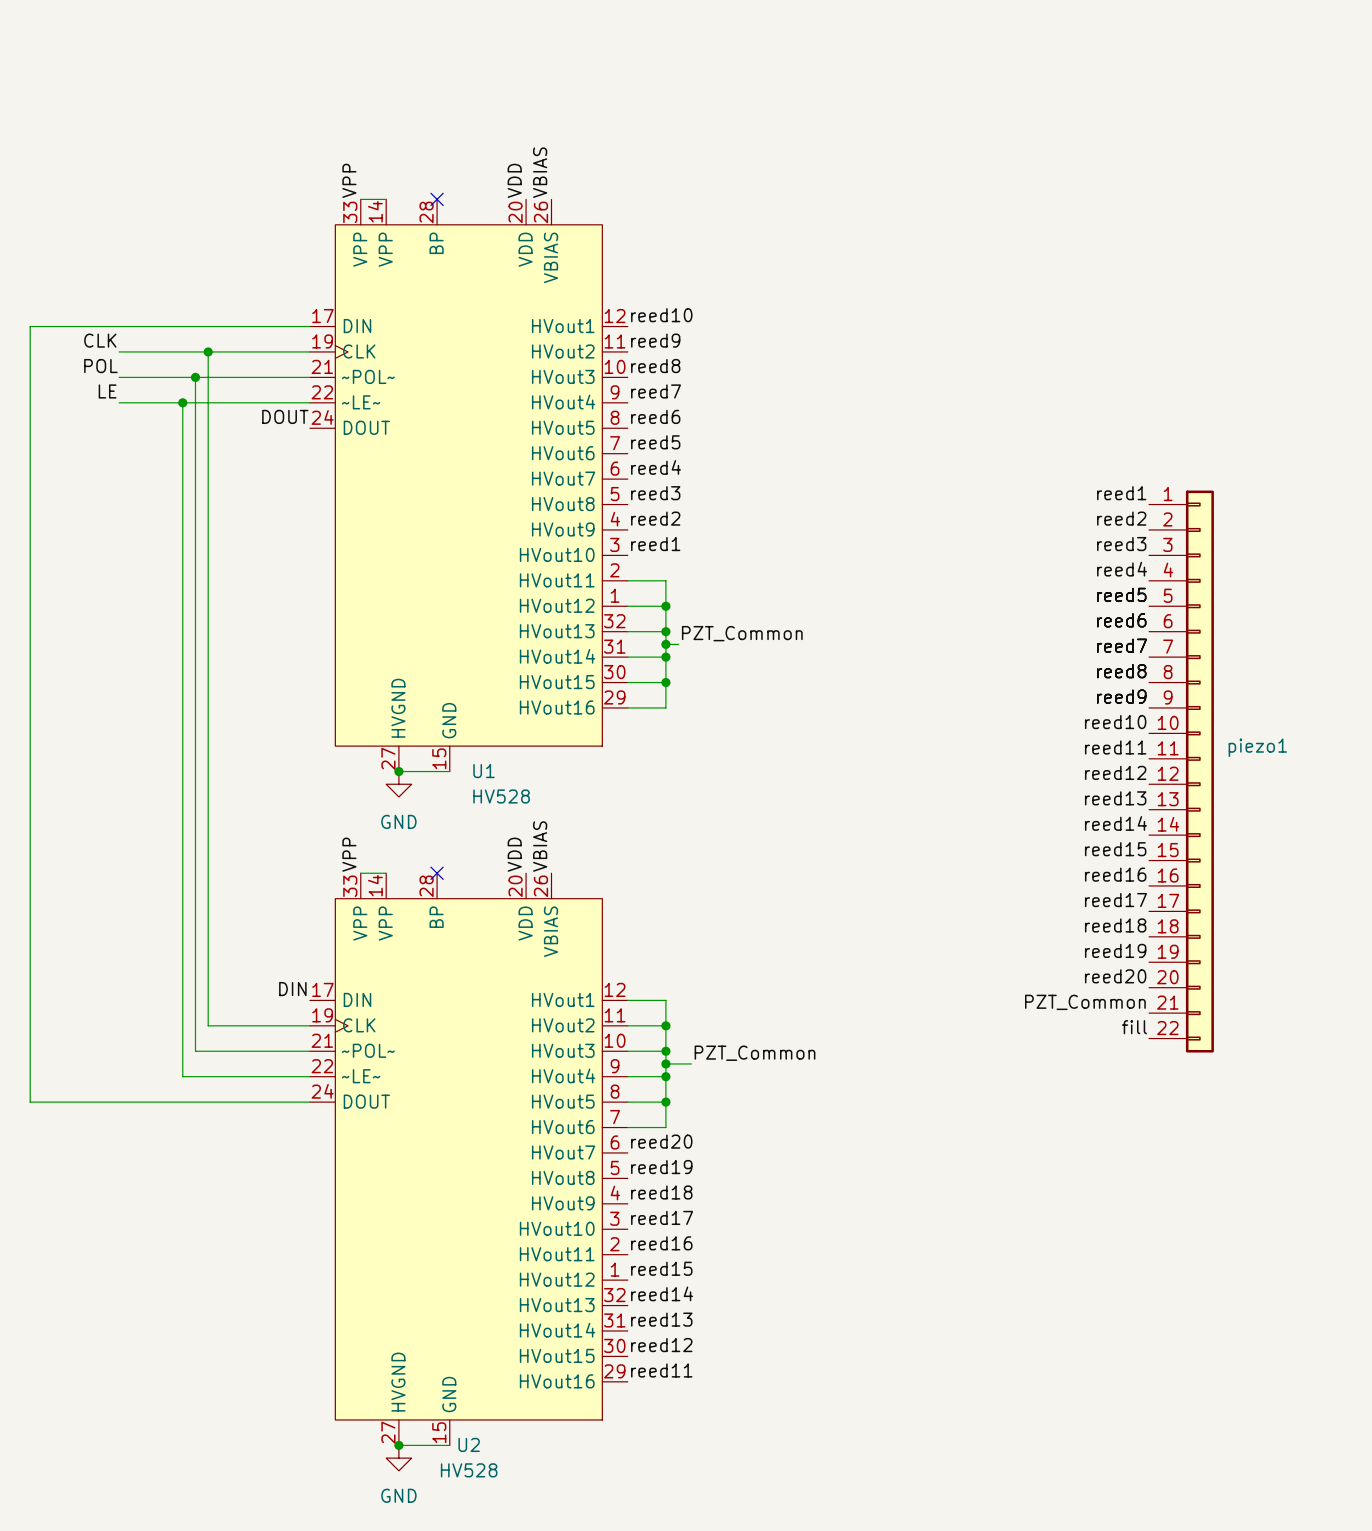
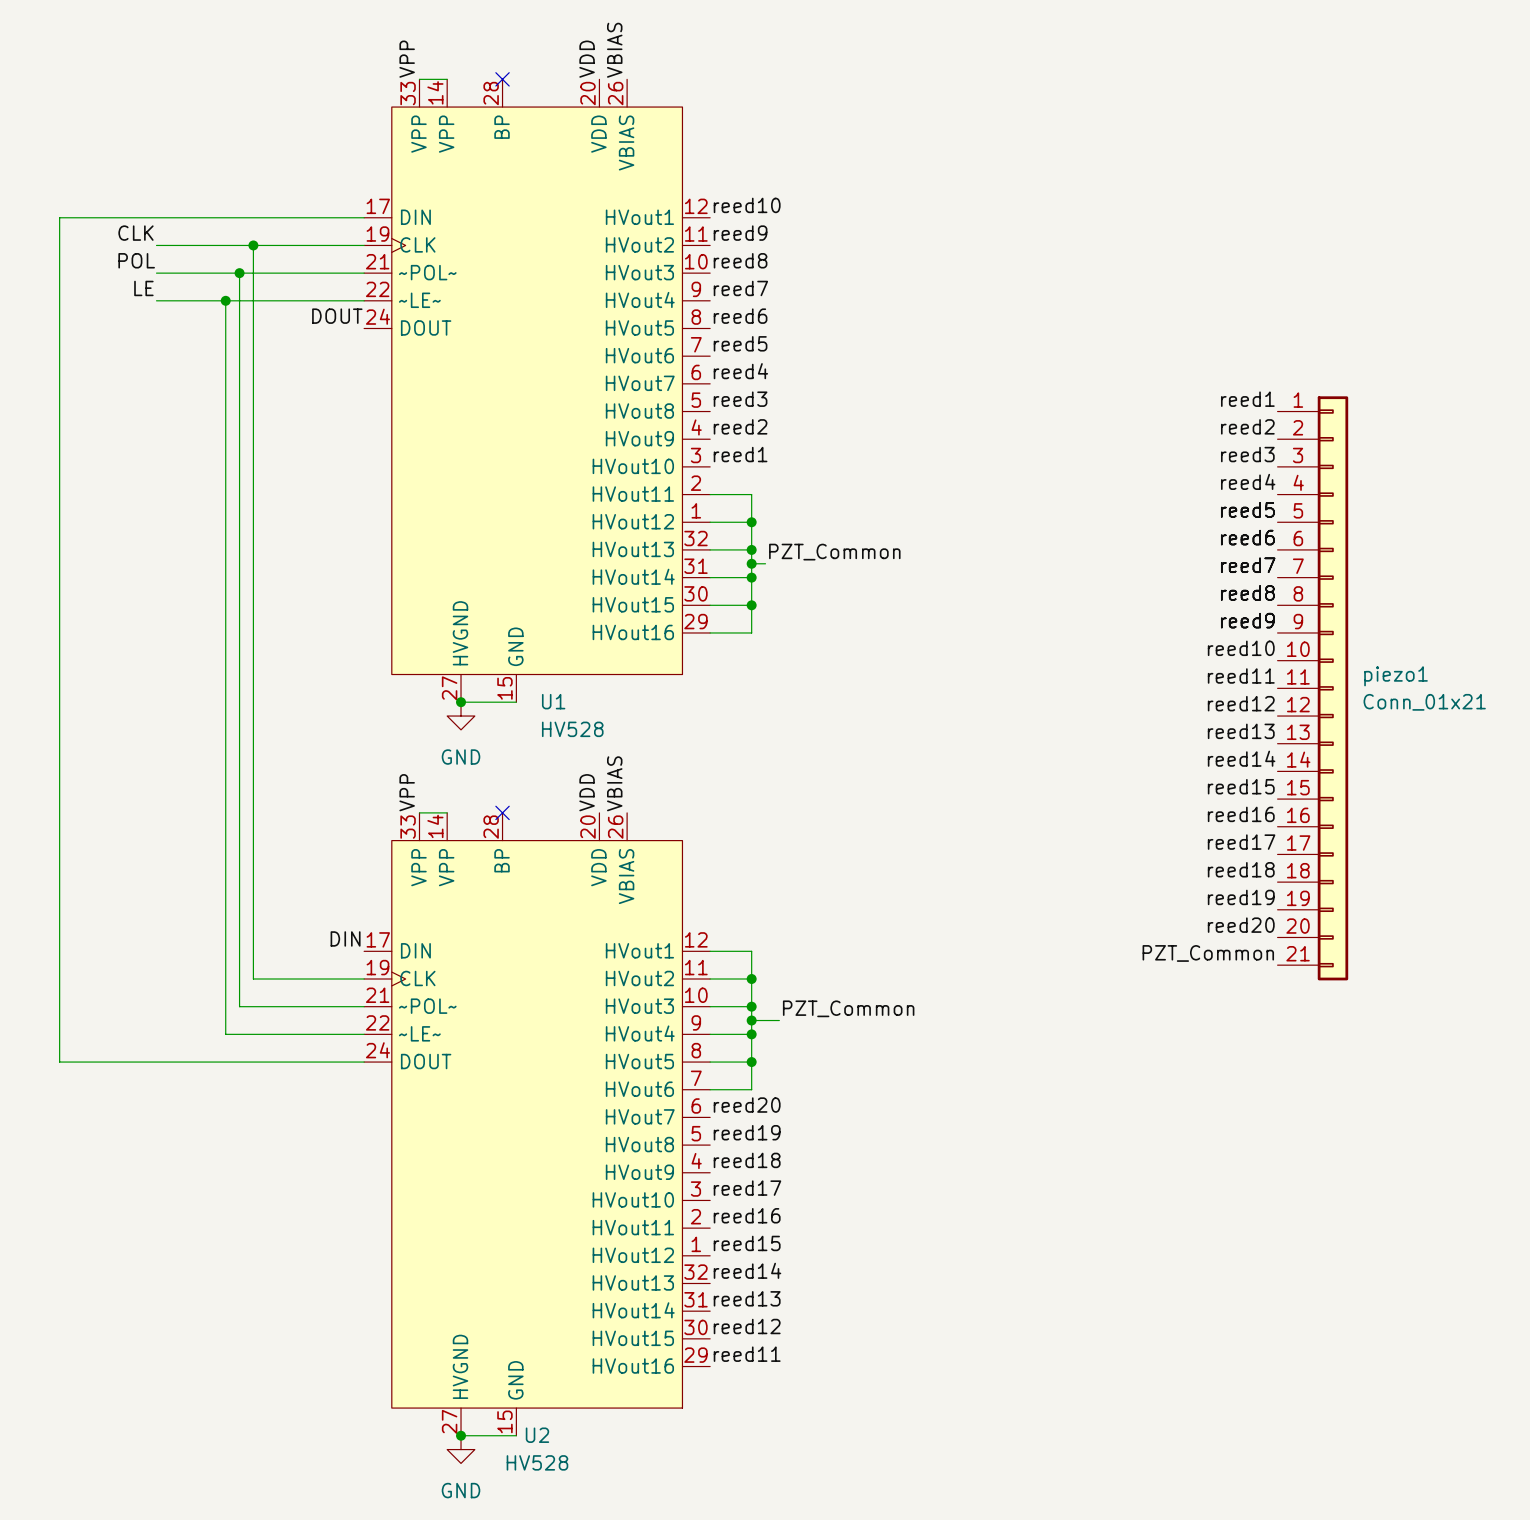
piezo1 symbol: [1149, 490, 1214, 1053] -> [1277, 396, 1349, 981]
piezo1 value: none -> Conn_01x21 (1424, 702)
label: fill (1134, 1027) -> none

